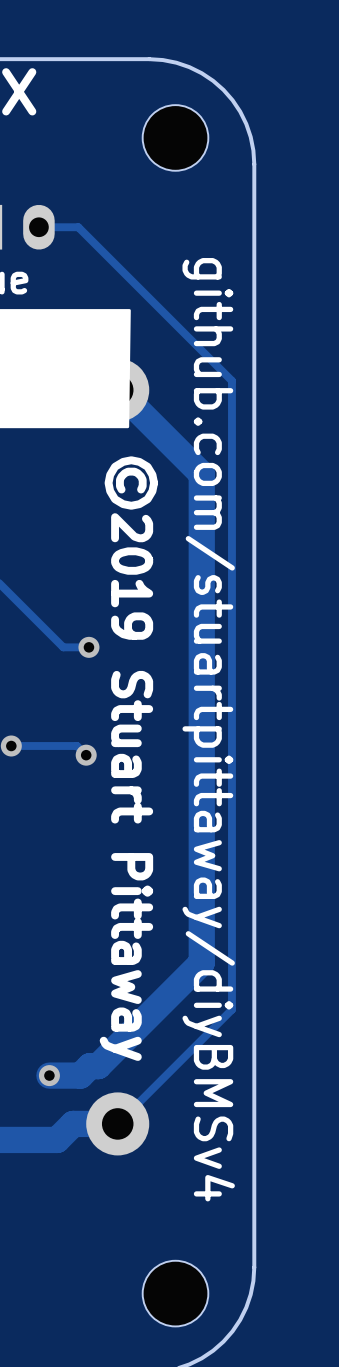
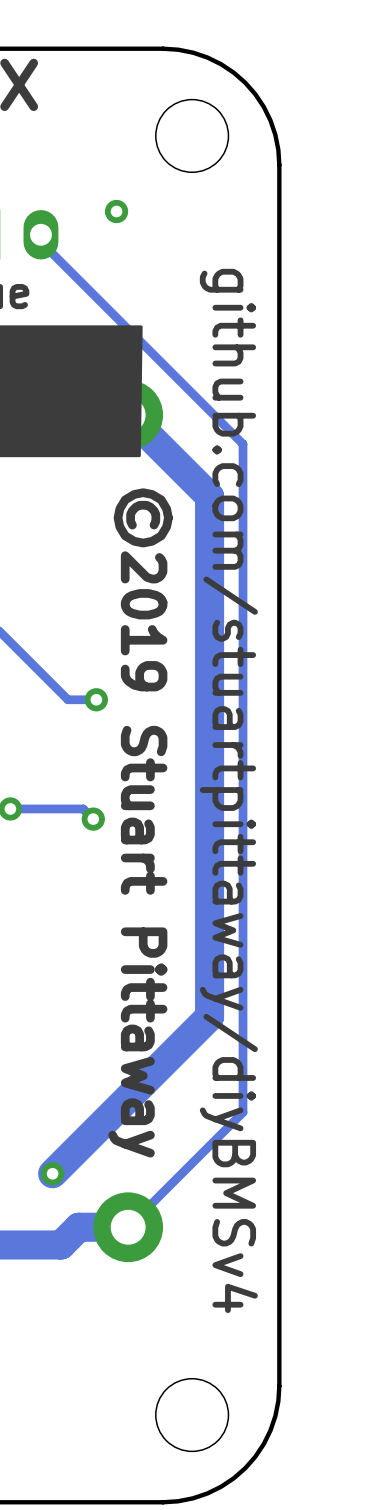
via: none -> (116, 211)
track: (38, 227) (78, 227) (231, 380) (231, 1009) (221, 1020) -> (40, 234) (40, 242) (243, 444) (243, 1112)
track: (191, 463) (201, 474) (201, 962) (98, 1066) (89, 1066) (80, 1075) (49, 1075) -> (209, 496) (209, 1016) (52, 1173)

